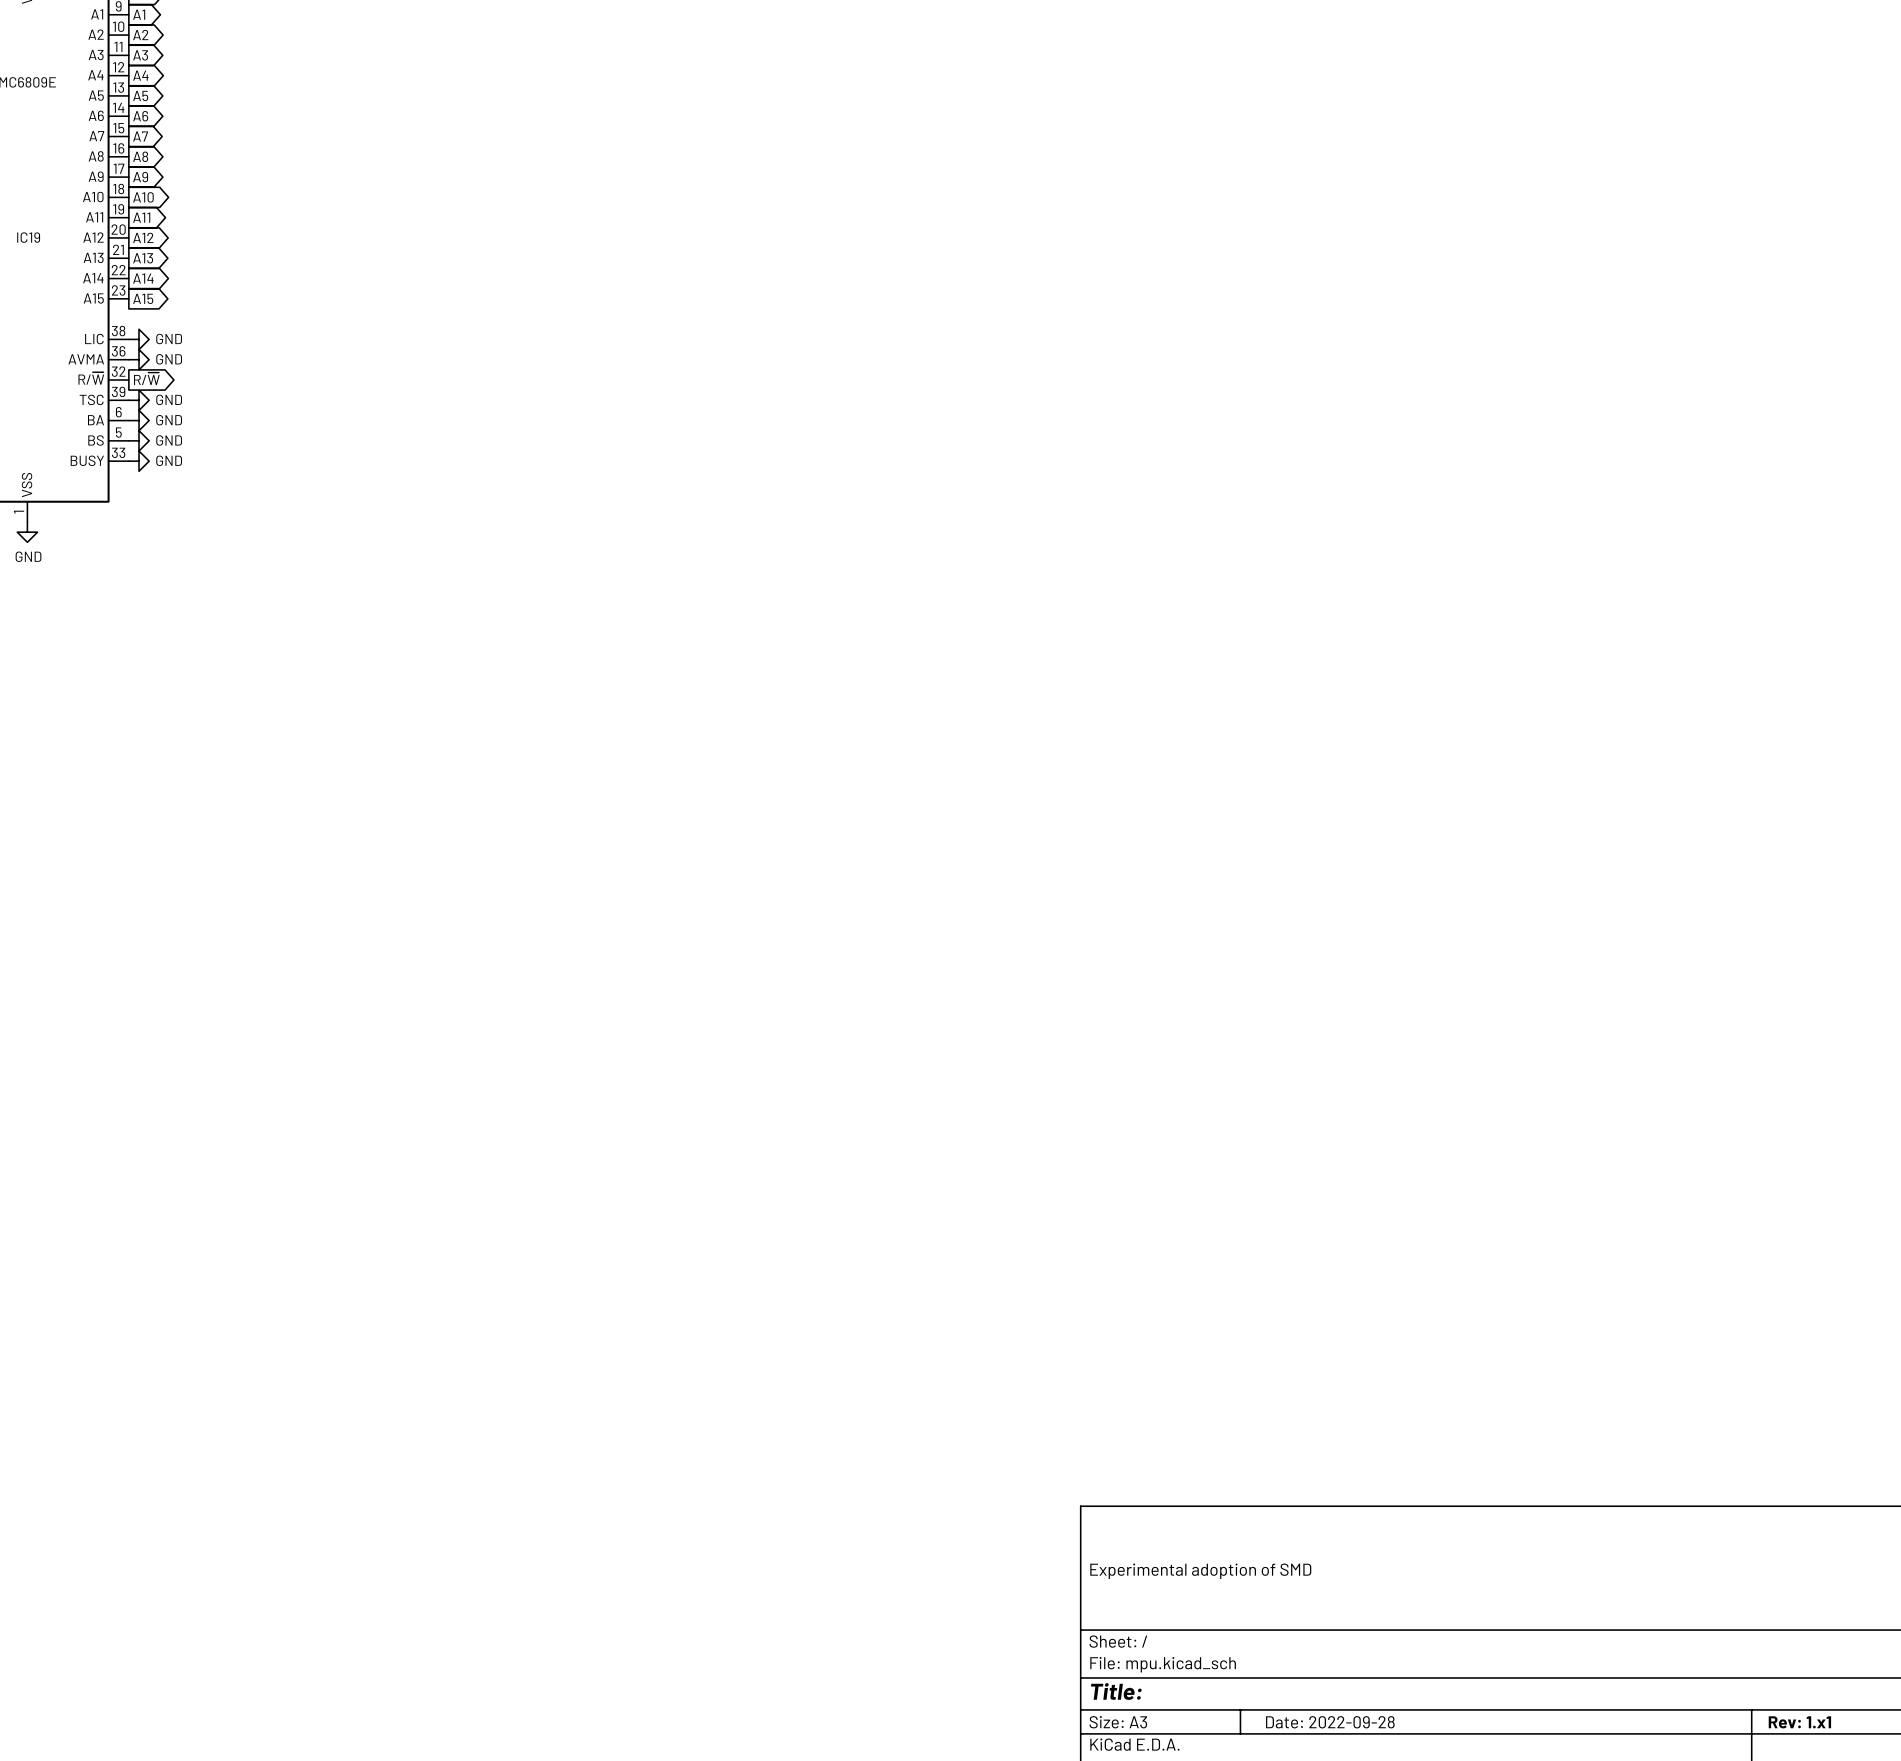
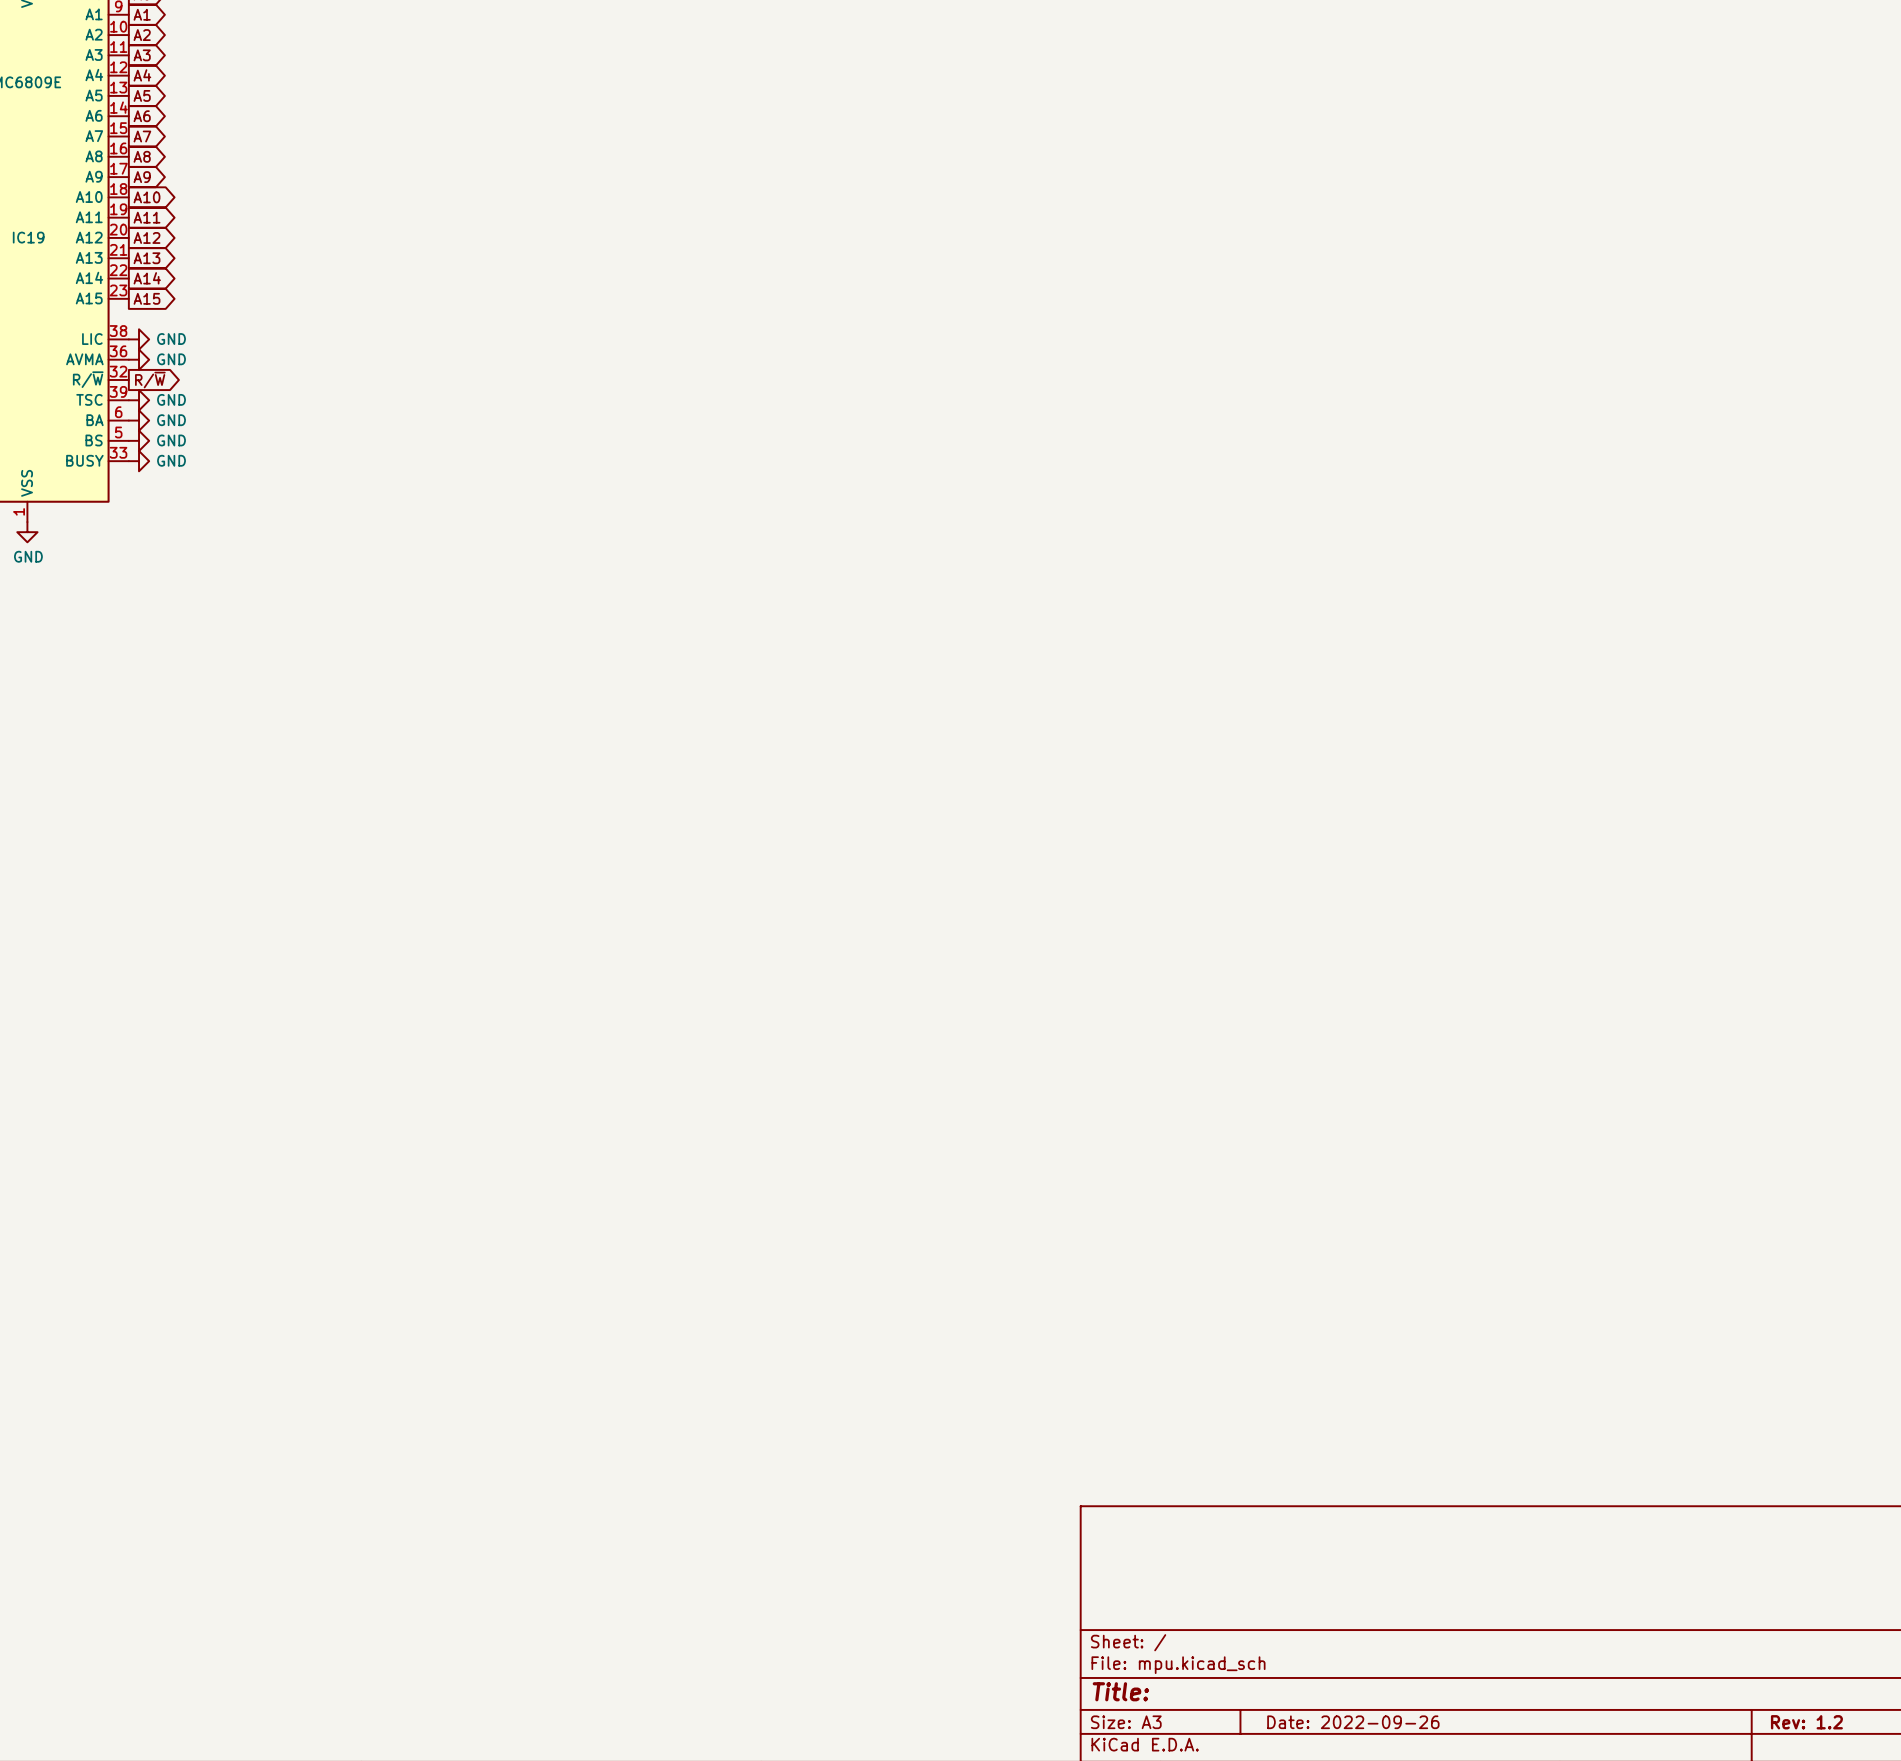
title block: Experimental adoption of SMD (1200, 1571) -> none
title block: Date: 2022-09-28 (1330, 1722) -> Date: 2022-09-26 (1353, 1722)
title block: Rev: 1.x1 (1799, 1722) -> Rev: 1.2 (1806, 1722)

